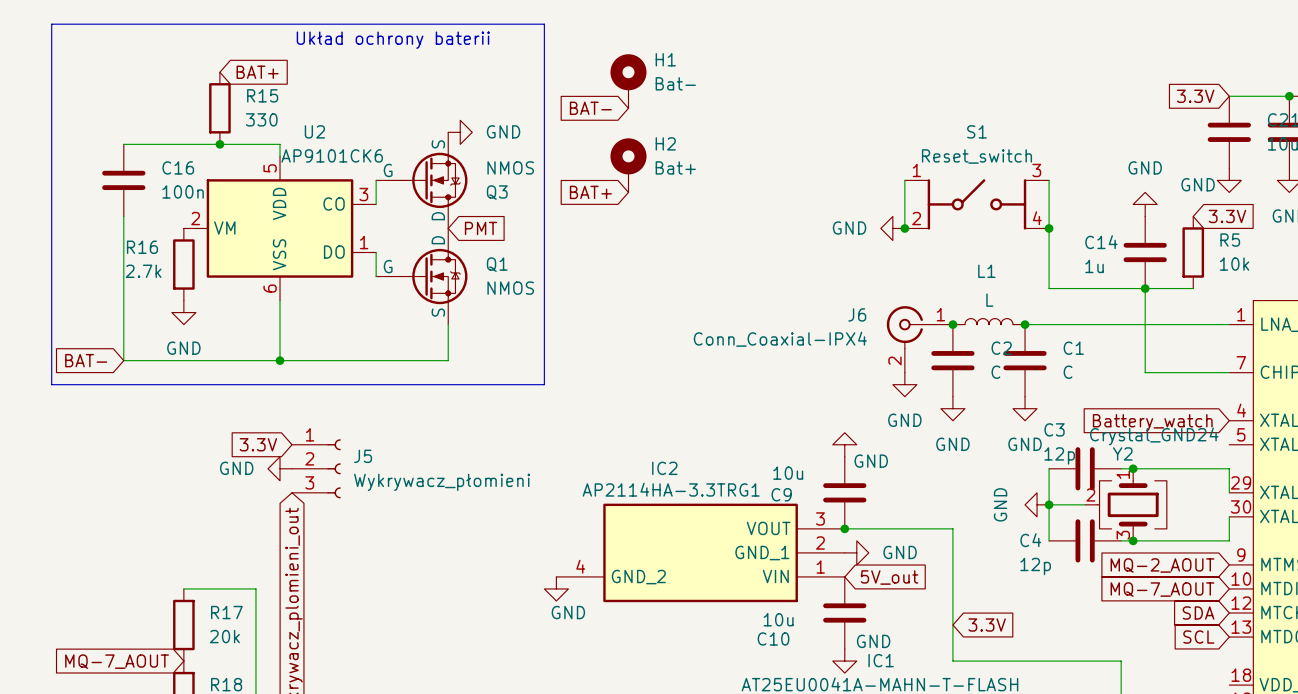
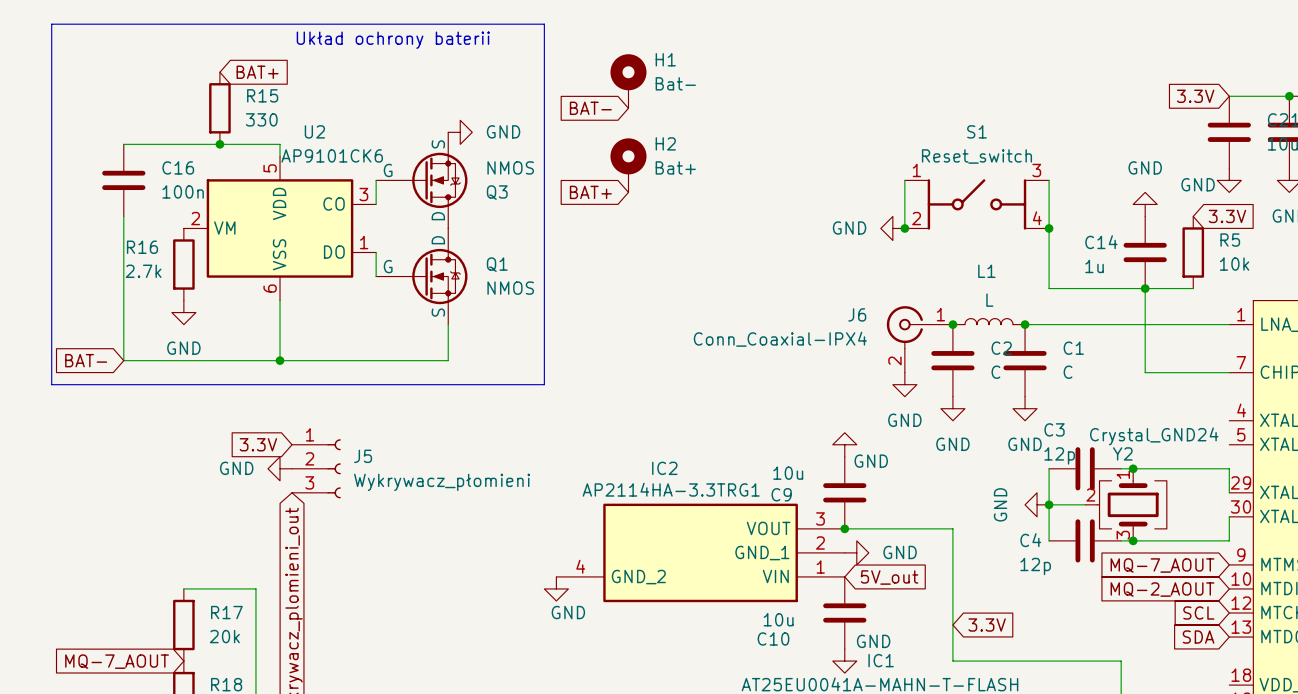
global label: PMT (481, 228) -> none
global label: Battery_watch (1152, 422) -> none
global label: MQ-2_AOUT (1162, 565) -> MQ-7_AOUT (1162, 565)
global label: MQ-7_AOUT (1162, 589) -> MQ-2_AOUT (1162, 589)
global label: SDA (1198, 612) -> SCL (1198, 612)
global label: SCL (1198, 637) -> SDA (1198, 637)

